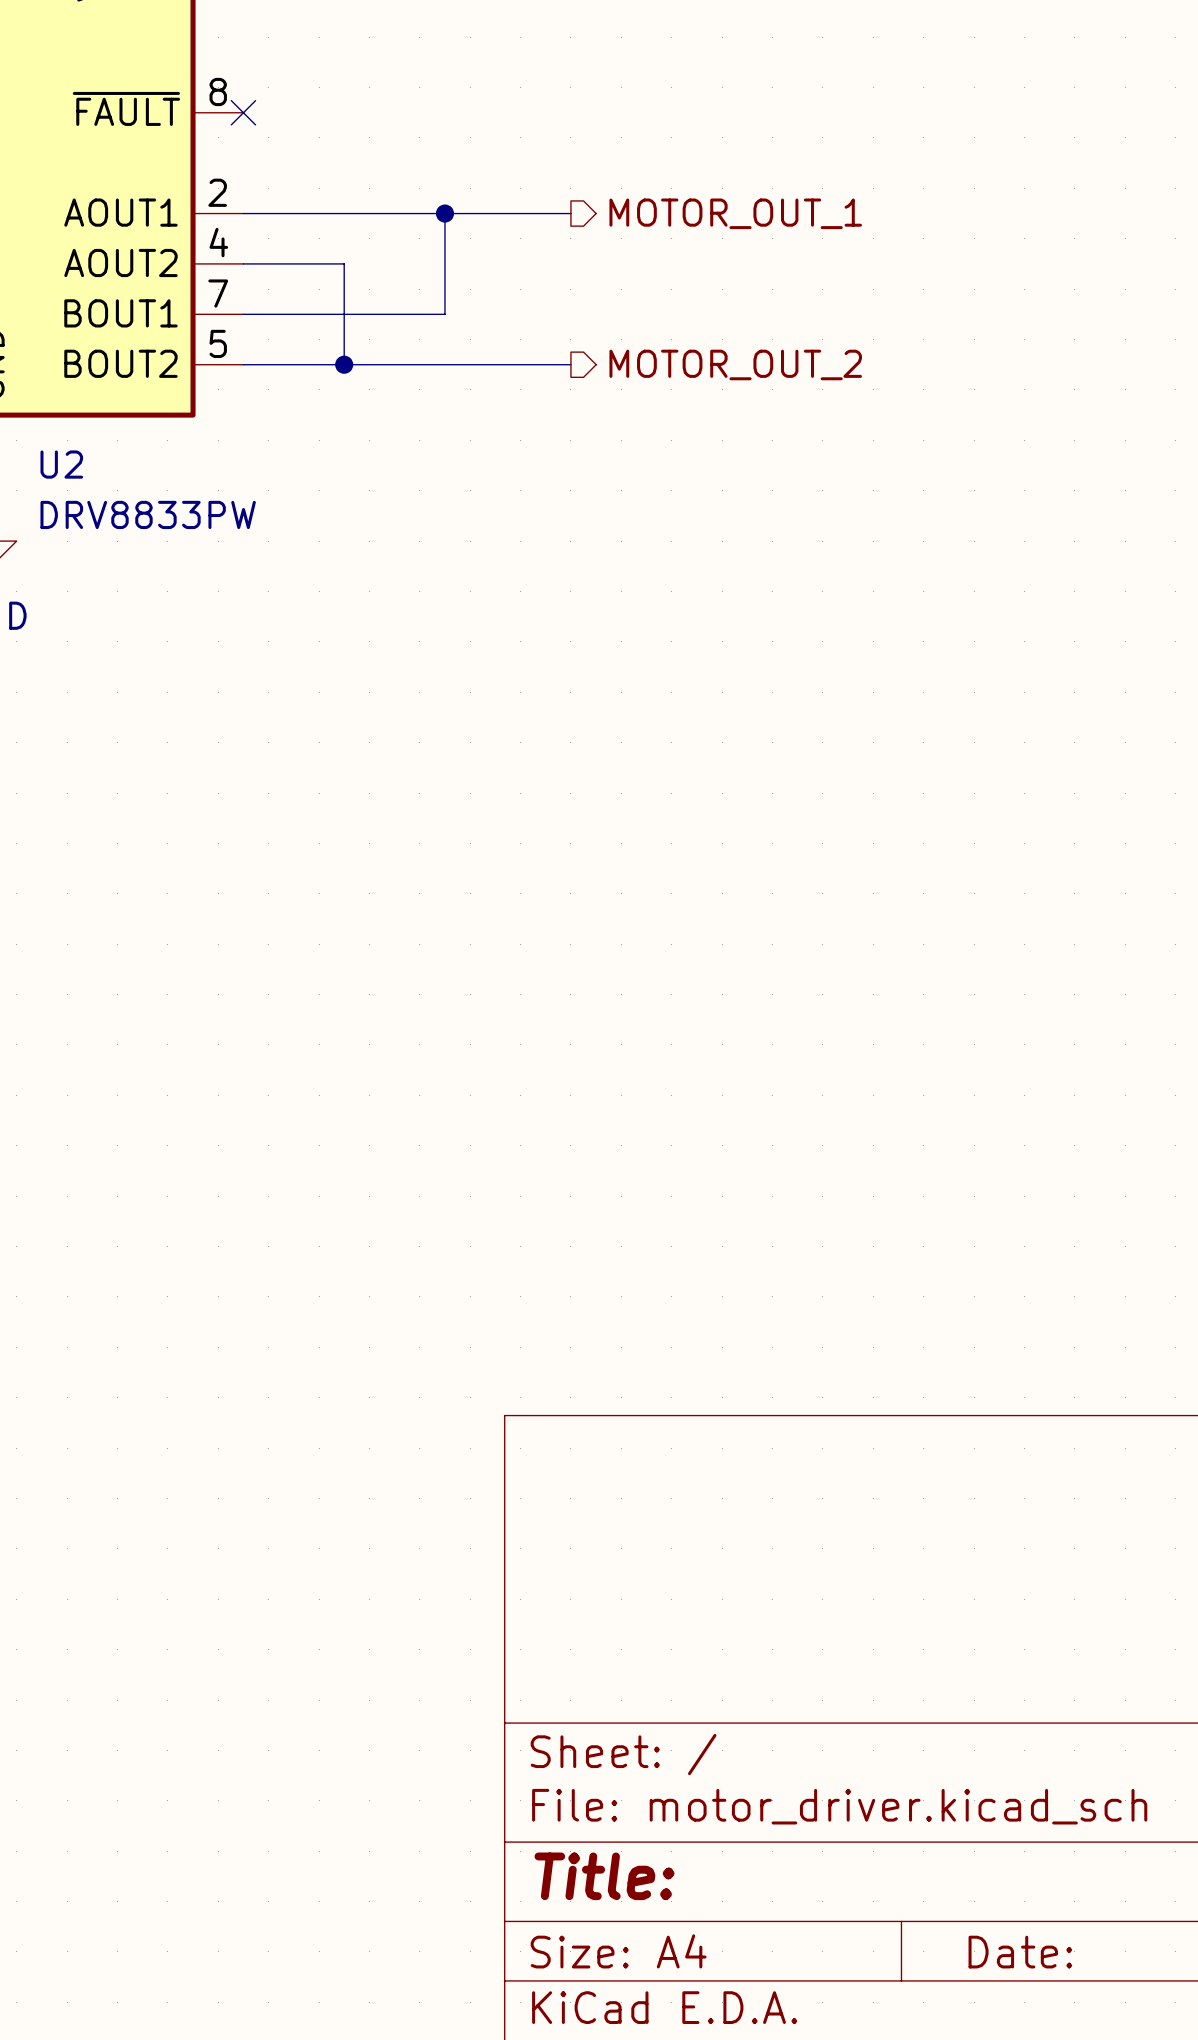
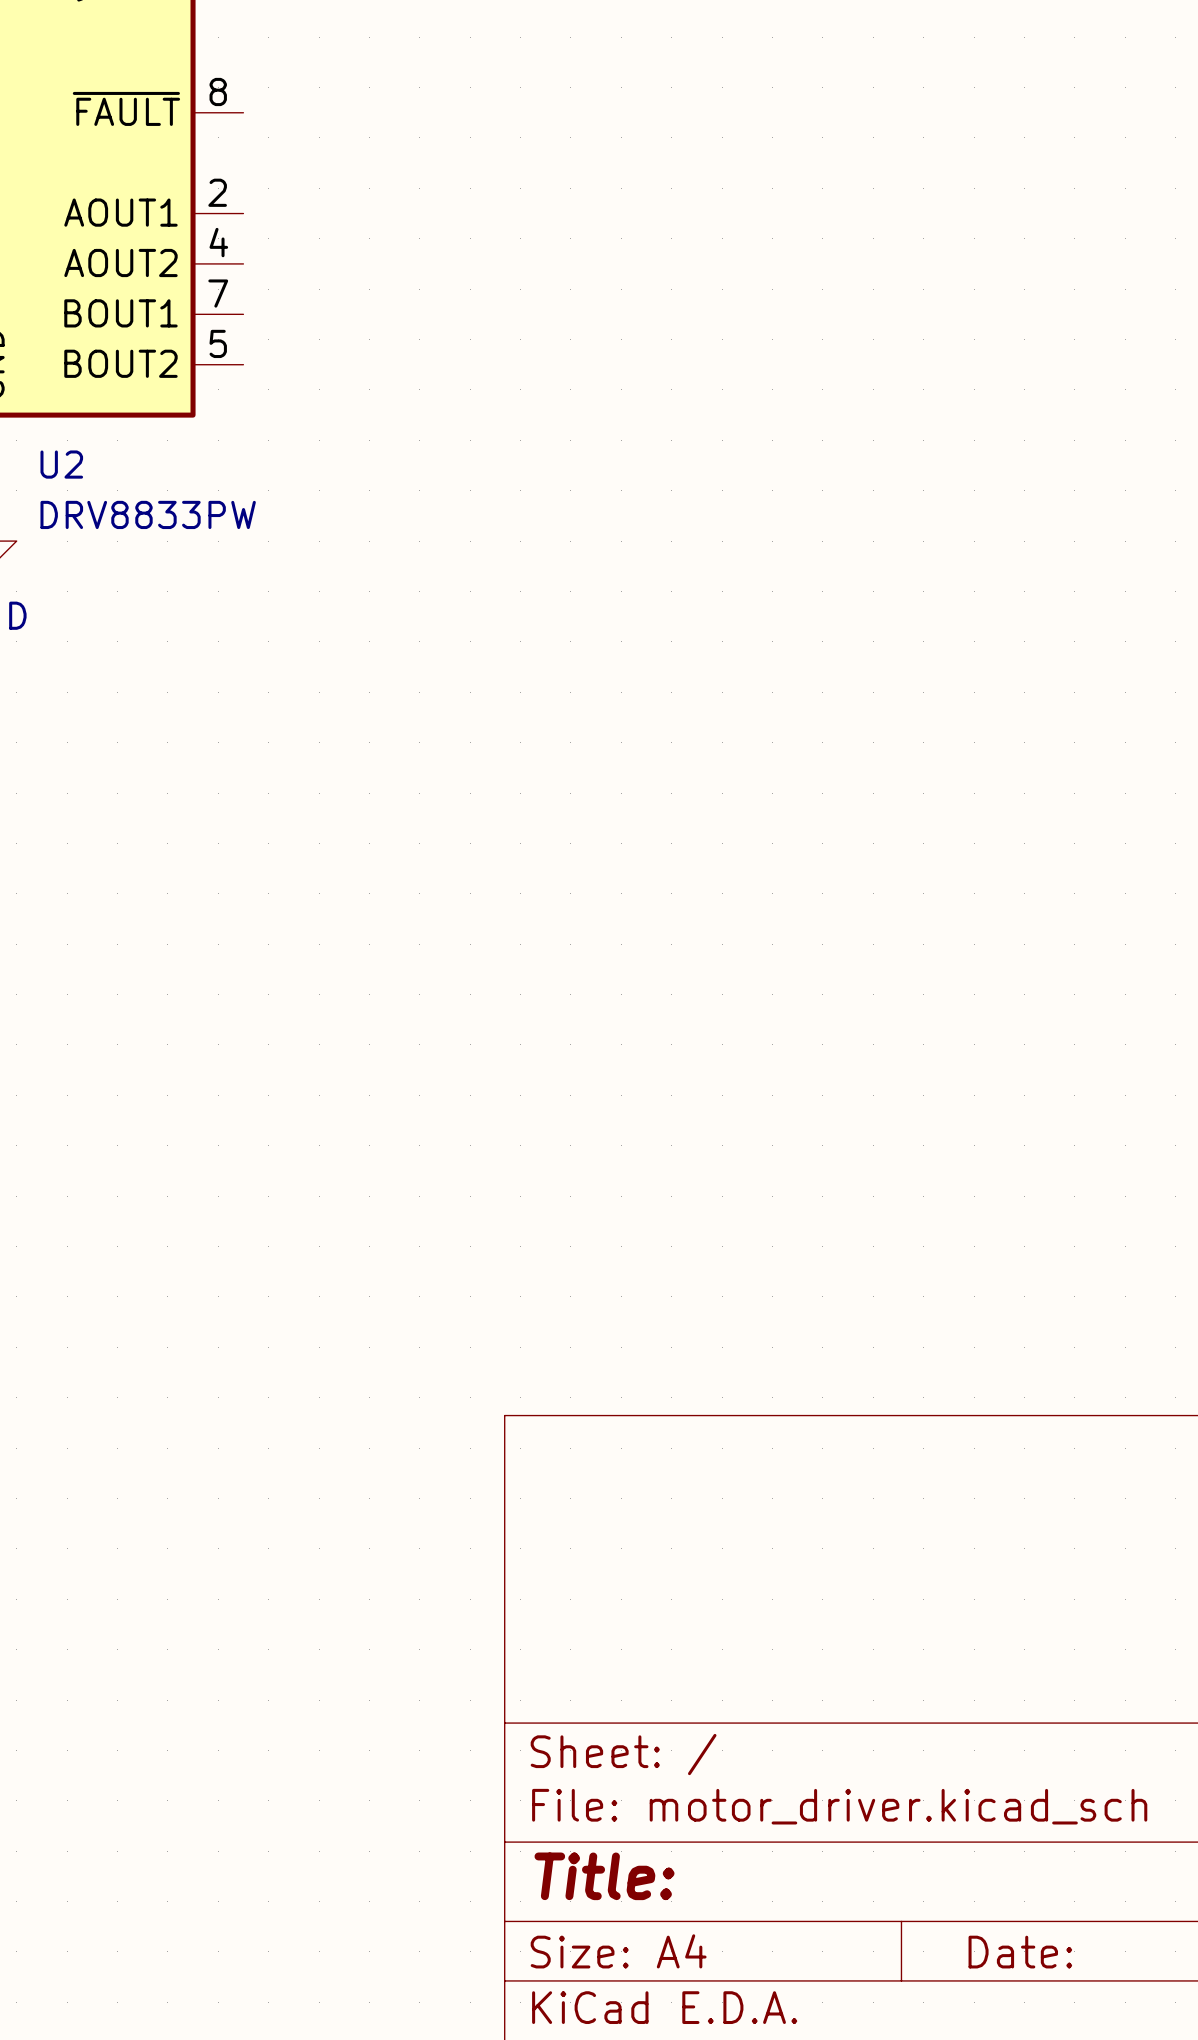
no-connect mark: (243, 112) -> none
wire: (243, 213) (570, 213) -> none
wire: (444, 213) (444, 314) (243, 314) -> none
junction: (444, 213) -> none
hierarchical label: MOTOR_OUT_1 (735, 213) -> none
wire: (243, 263) (344, 263) (344, 364) -> none
wire: (243, 364) (570, 364) -> none
junction: (344, 364) -> none
hierarchical label: MOTOR_OUT_2 (735, 364) -> none

